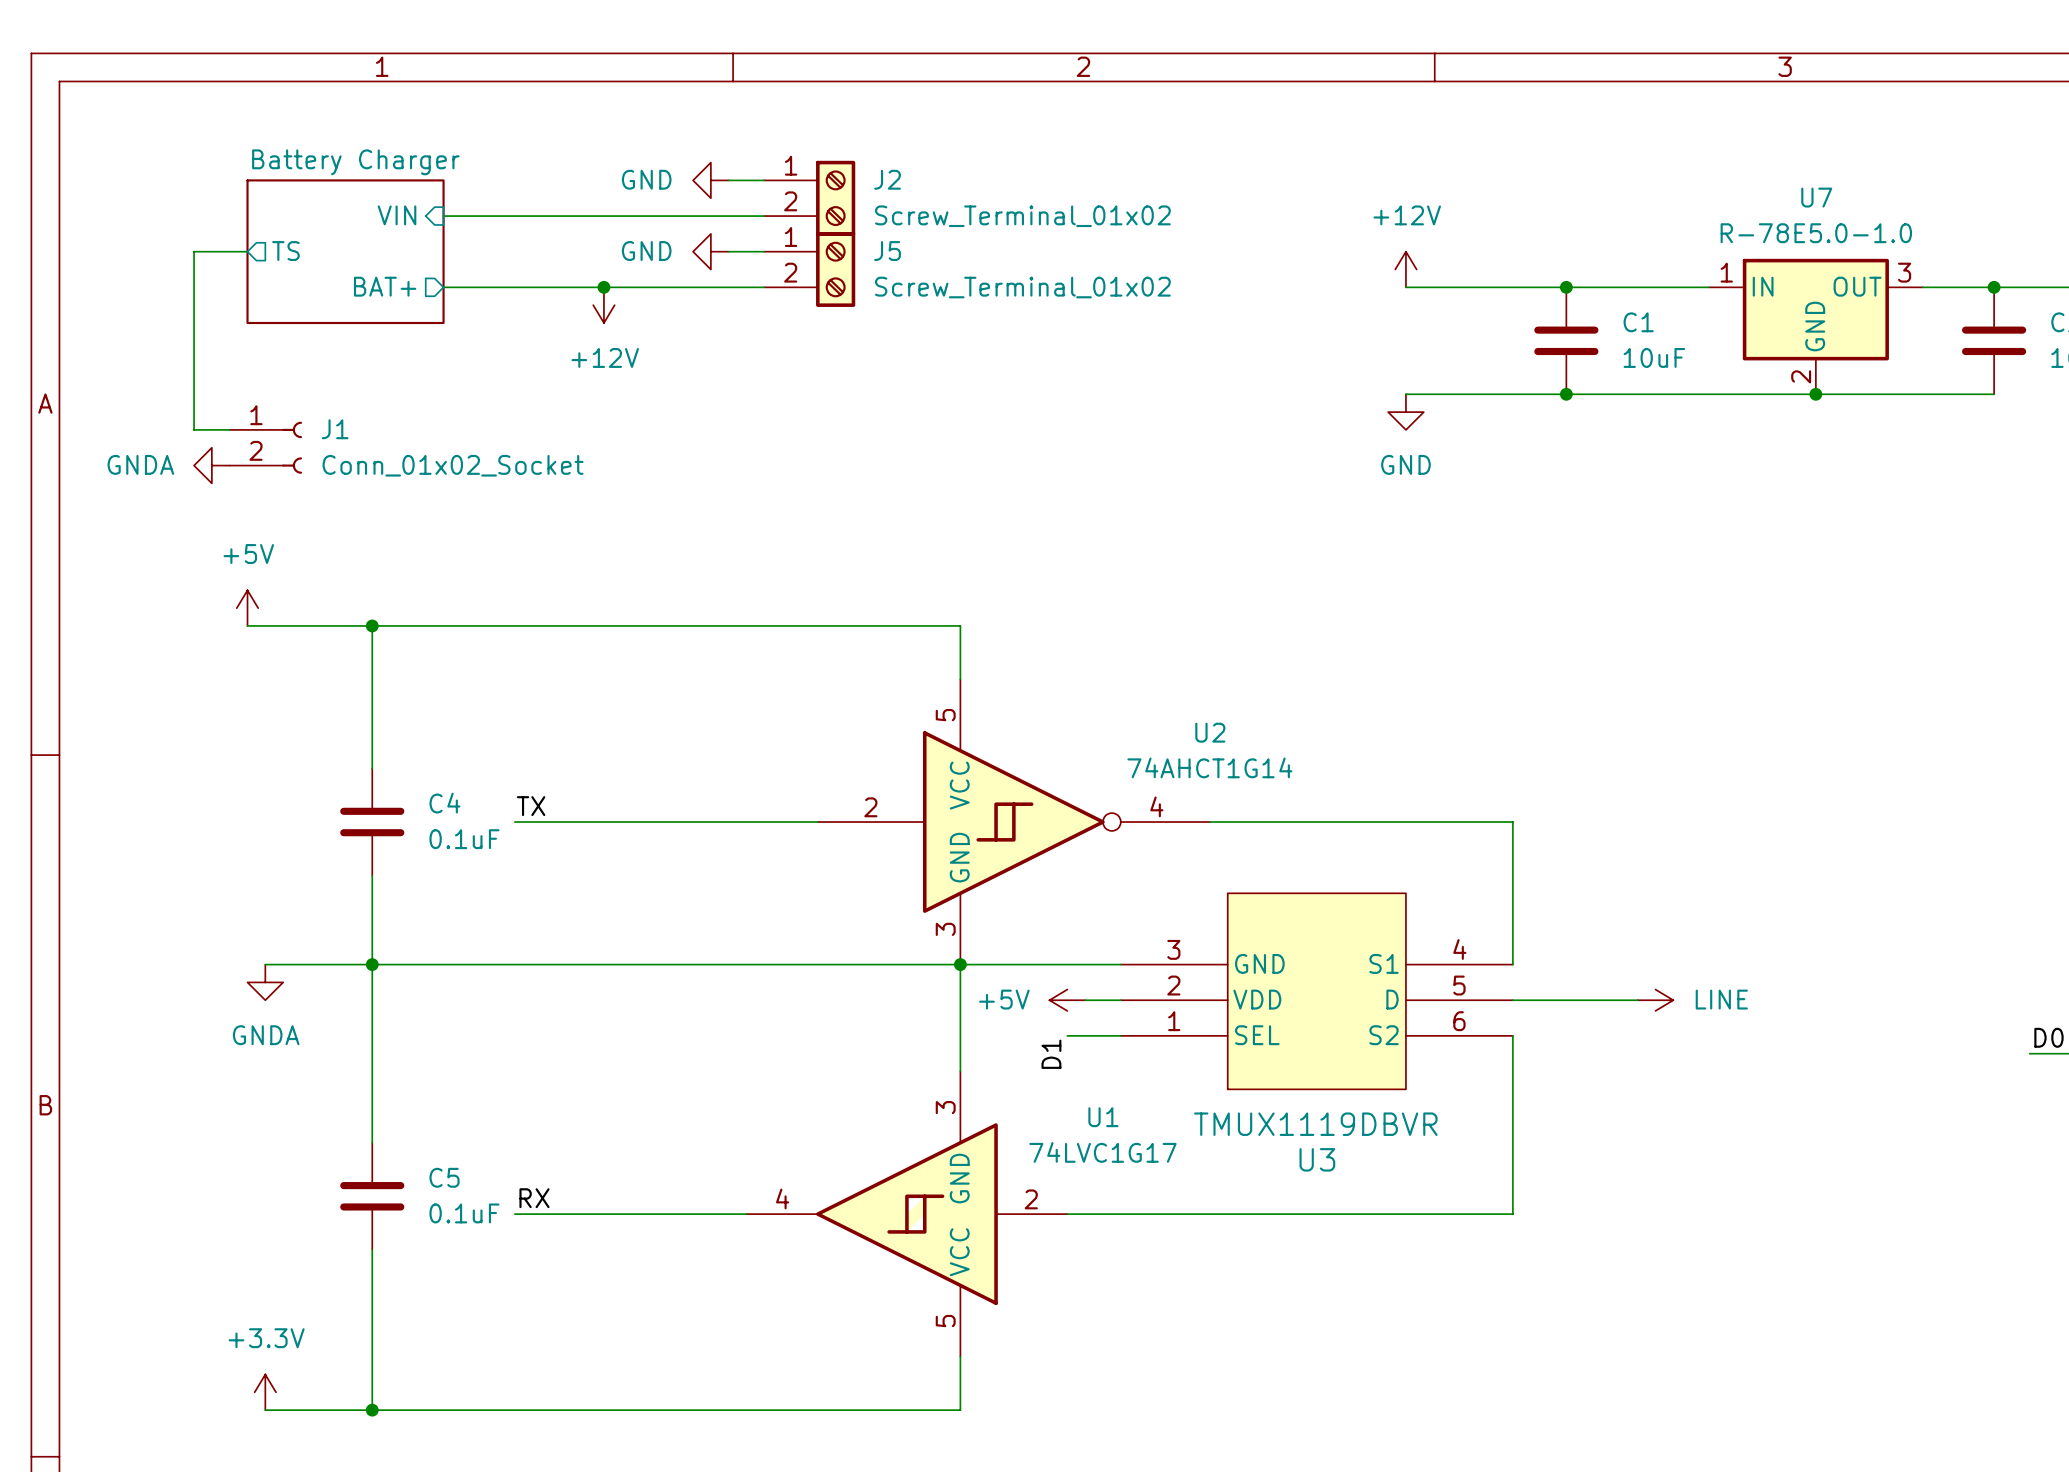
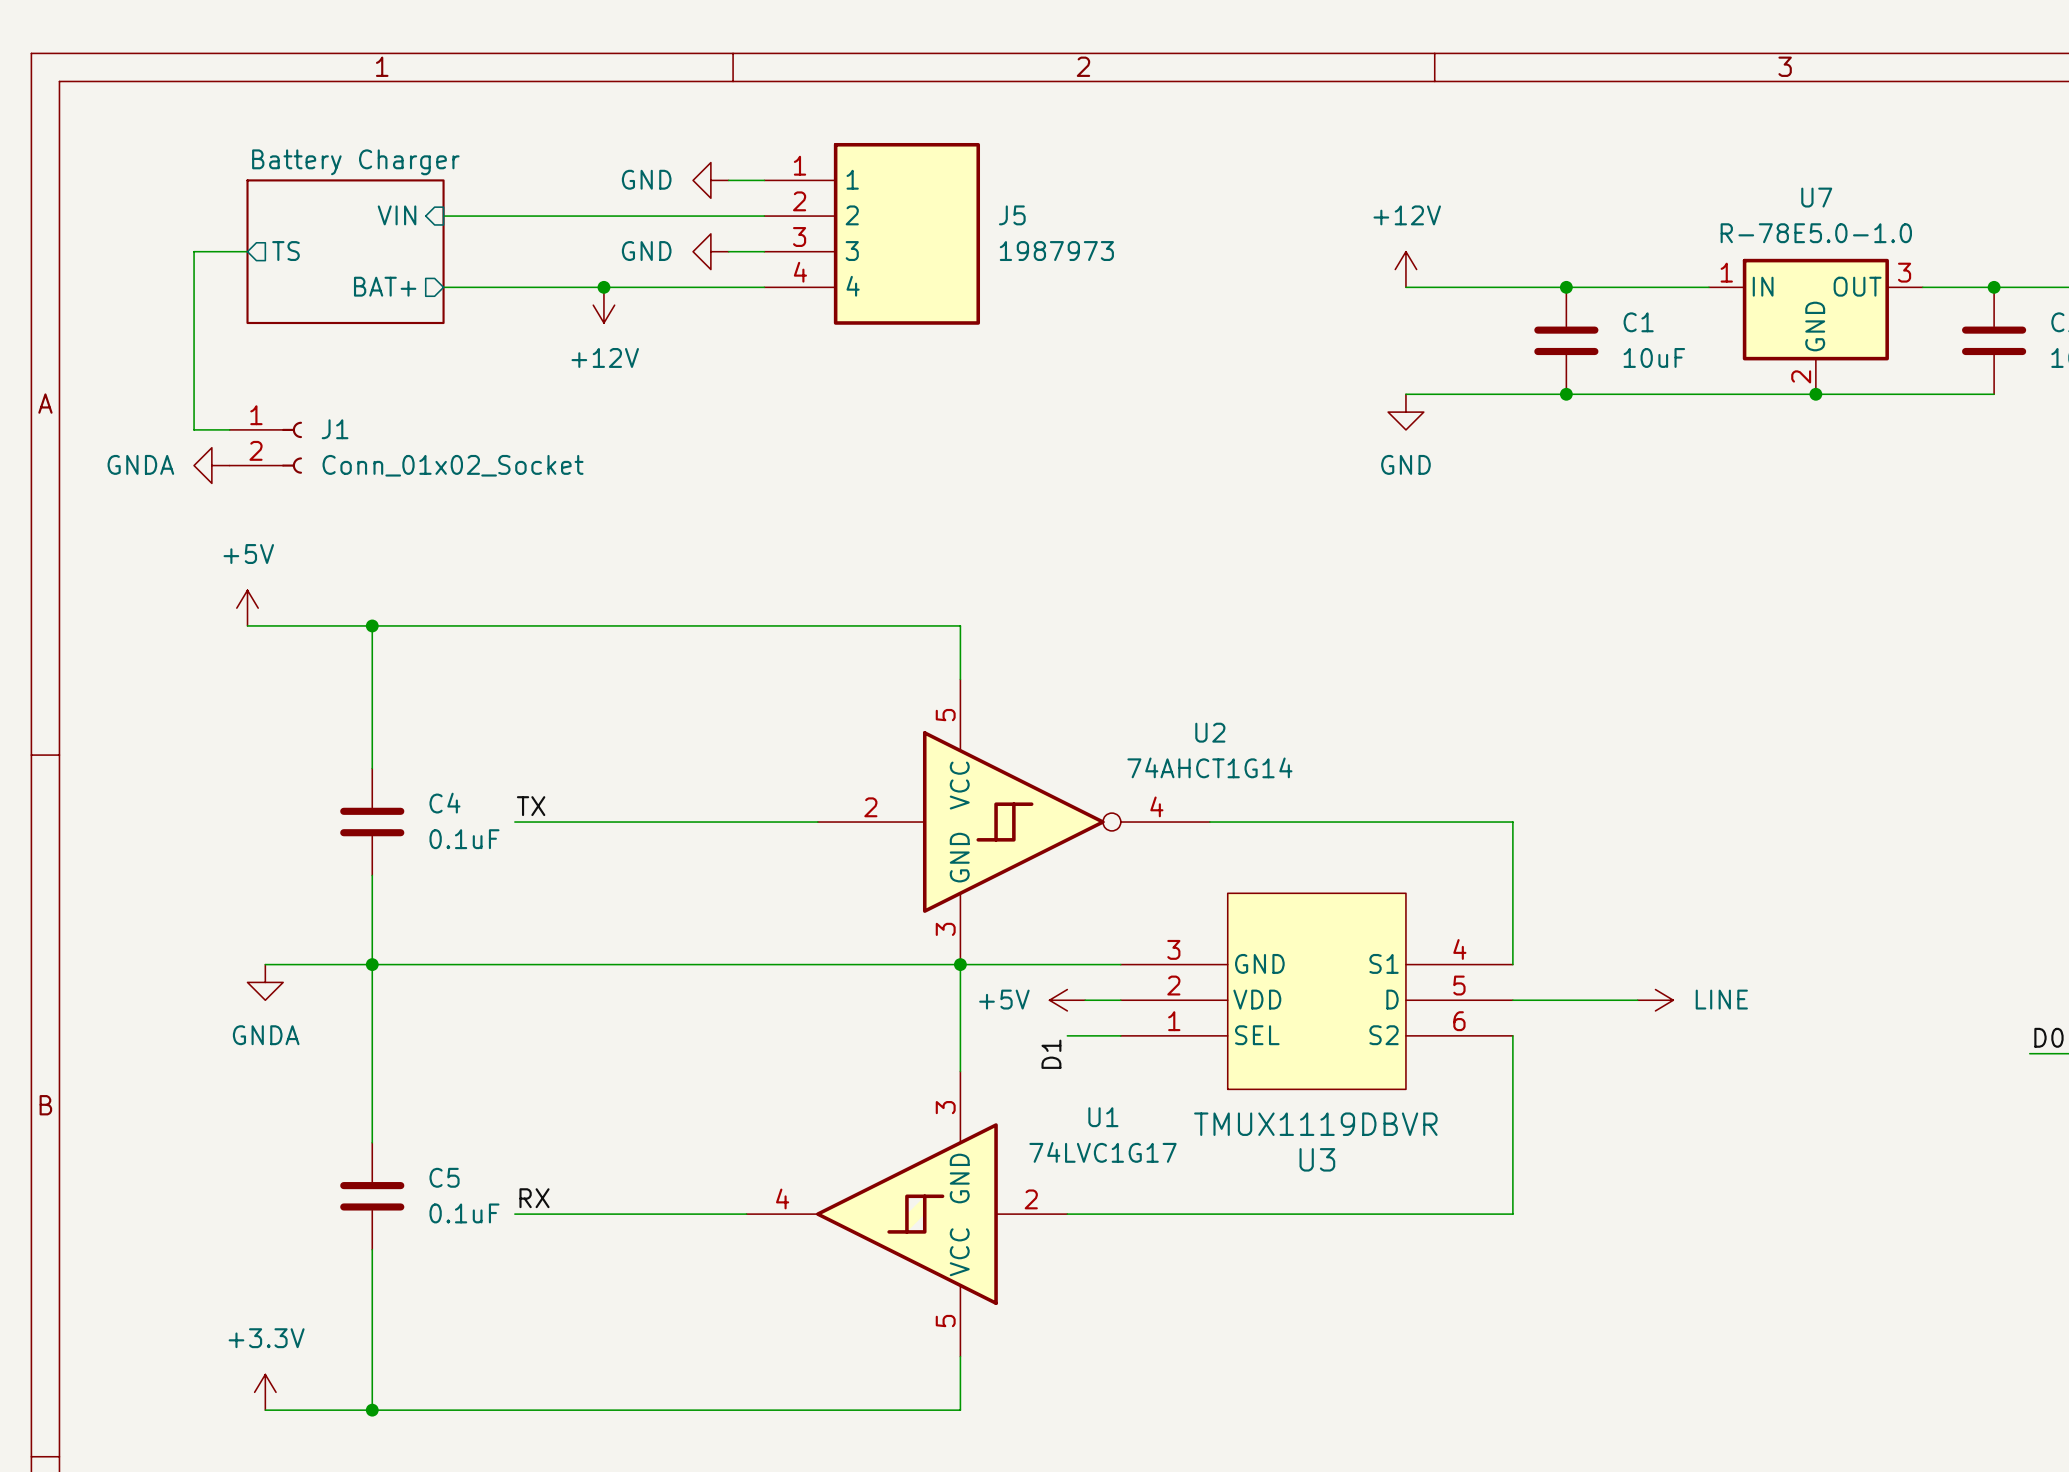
J2: Screw_Terminal_01x02 (809, 198) -> none
J5 symbol: [764, 232, 856, 307] -> [764, 142, 981, 325]
J5 name position: J5 (887, 251) -> J5 (1012, 215)
J5 value: Screw_Terminal_01x02 (1022, 287) -> 1987973 (1056, 251)

